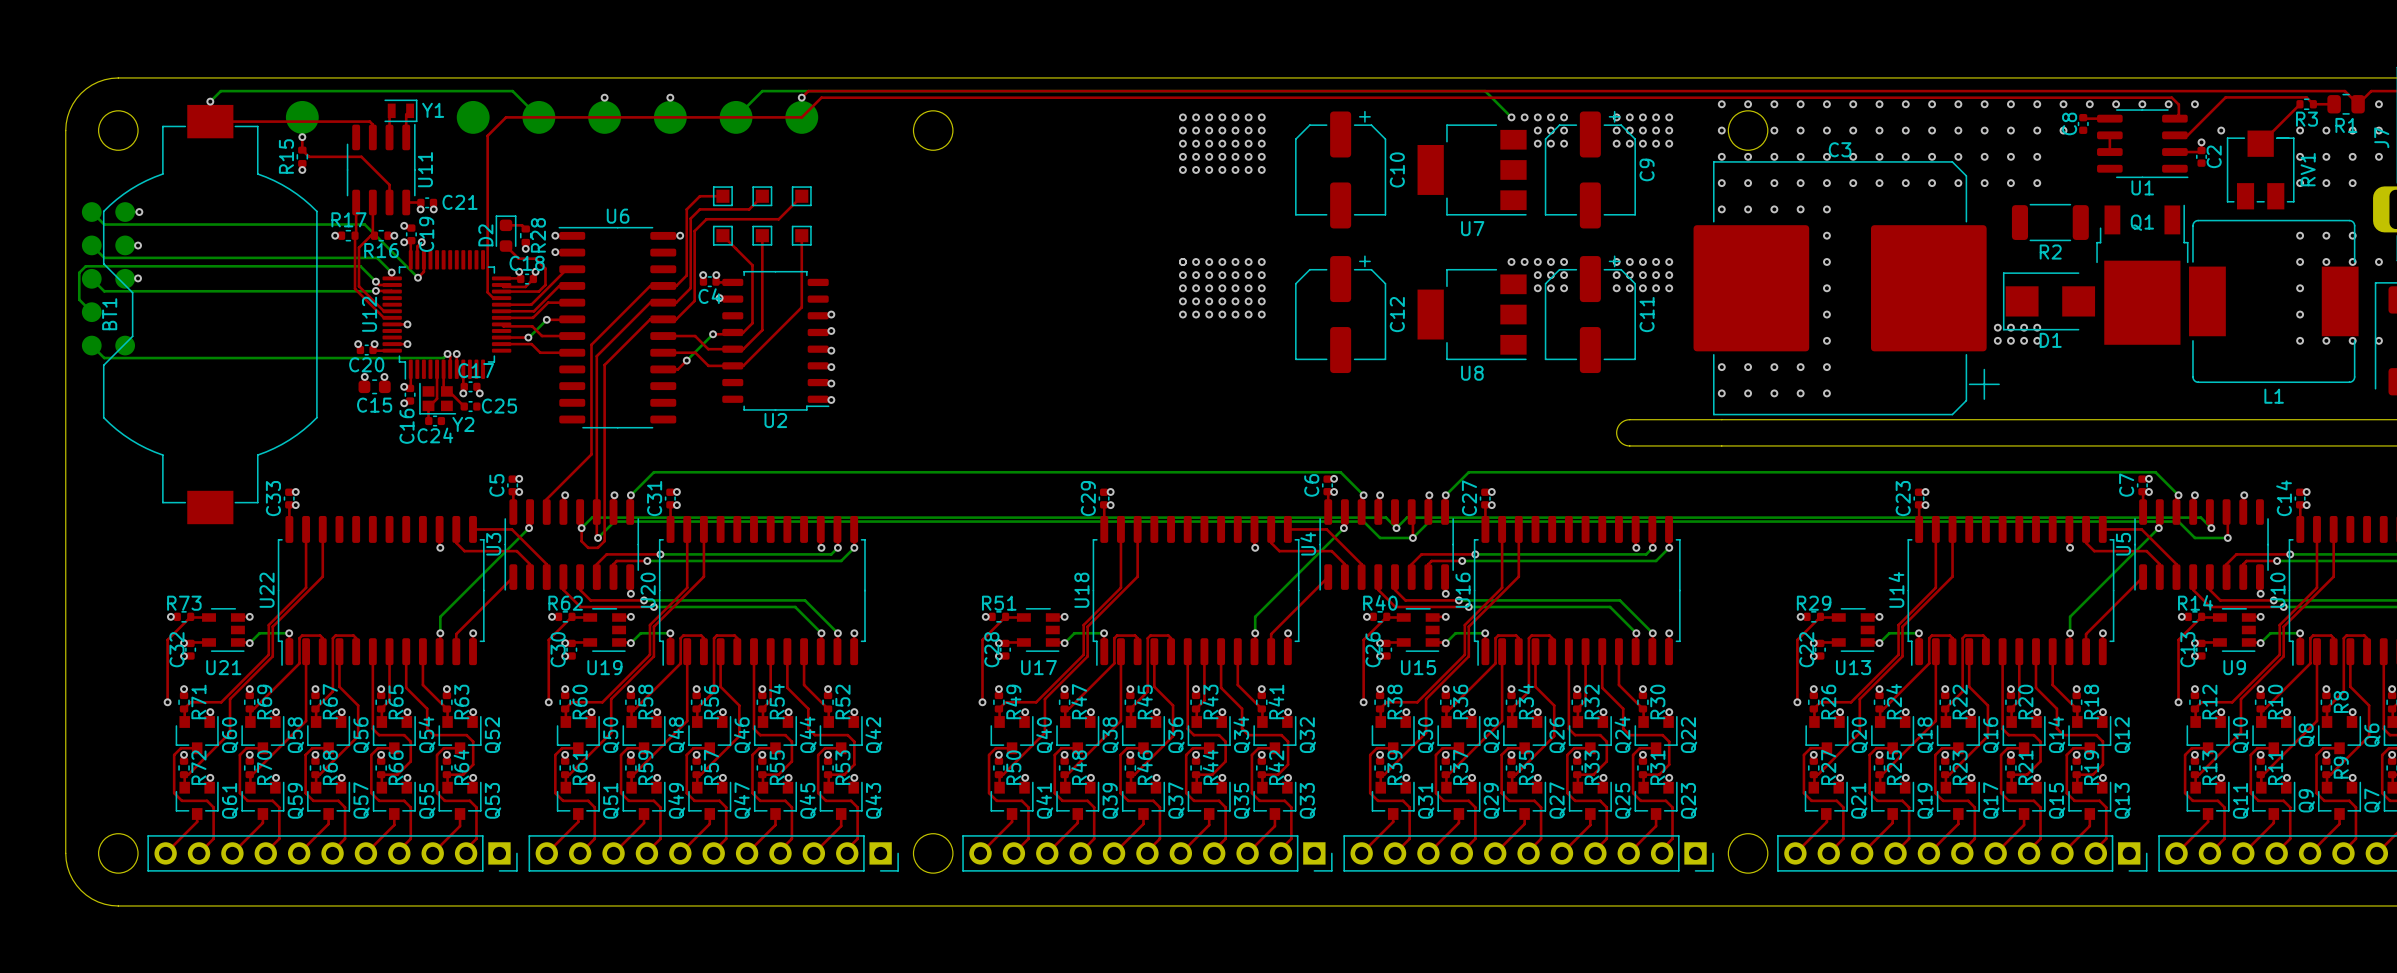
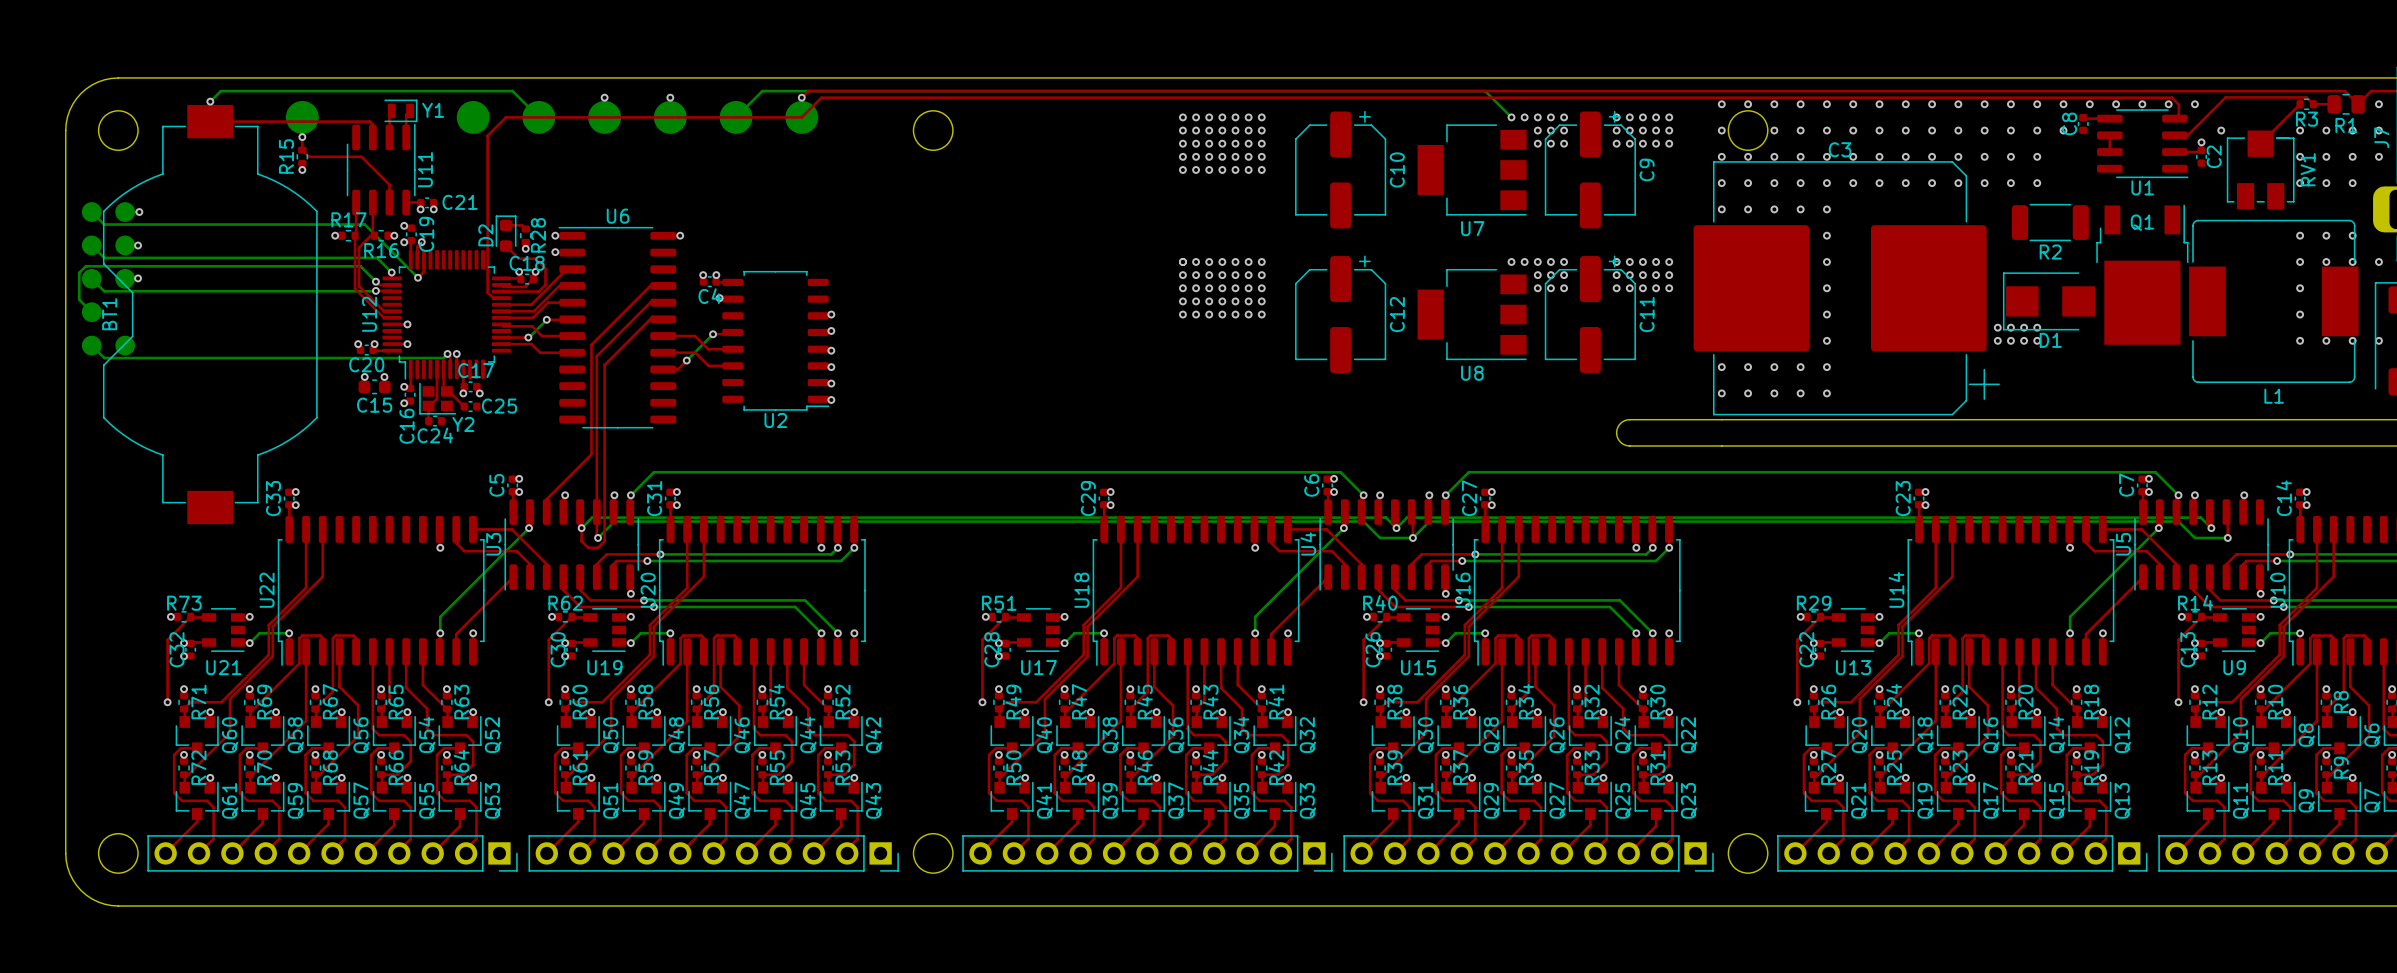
top track: (722, 196) (699, 196) (686, 209) (686, 275) (676, 285) (663, 285) -> none
part: (722, 196) -> none
top track: (762, 196) (749, 209) (699, 209) (690, 218) (690, 288) (676, 302) (663, 302) -> none
part: (762, 196) -> none
top track: (801, 196) (778, 219) (706, 219) (694, 231) (694, 300) (676, 319) (663, 319) -> none
part: (801, 196) -> none
top track: (722, 235) (752, 265) (752, 323) (743, 332) (732, 332) -> none
part: (722, 235) -> none
top track: (762, 235) (762, 330) (743, 349) (732, 349) -> none
part: (762, 235) -> none
top track: (801, 235) (801, 307) (743, 365) (732, 365) -> none
part: (801, 235) -> none

